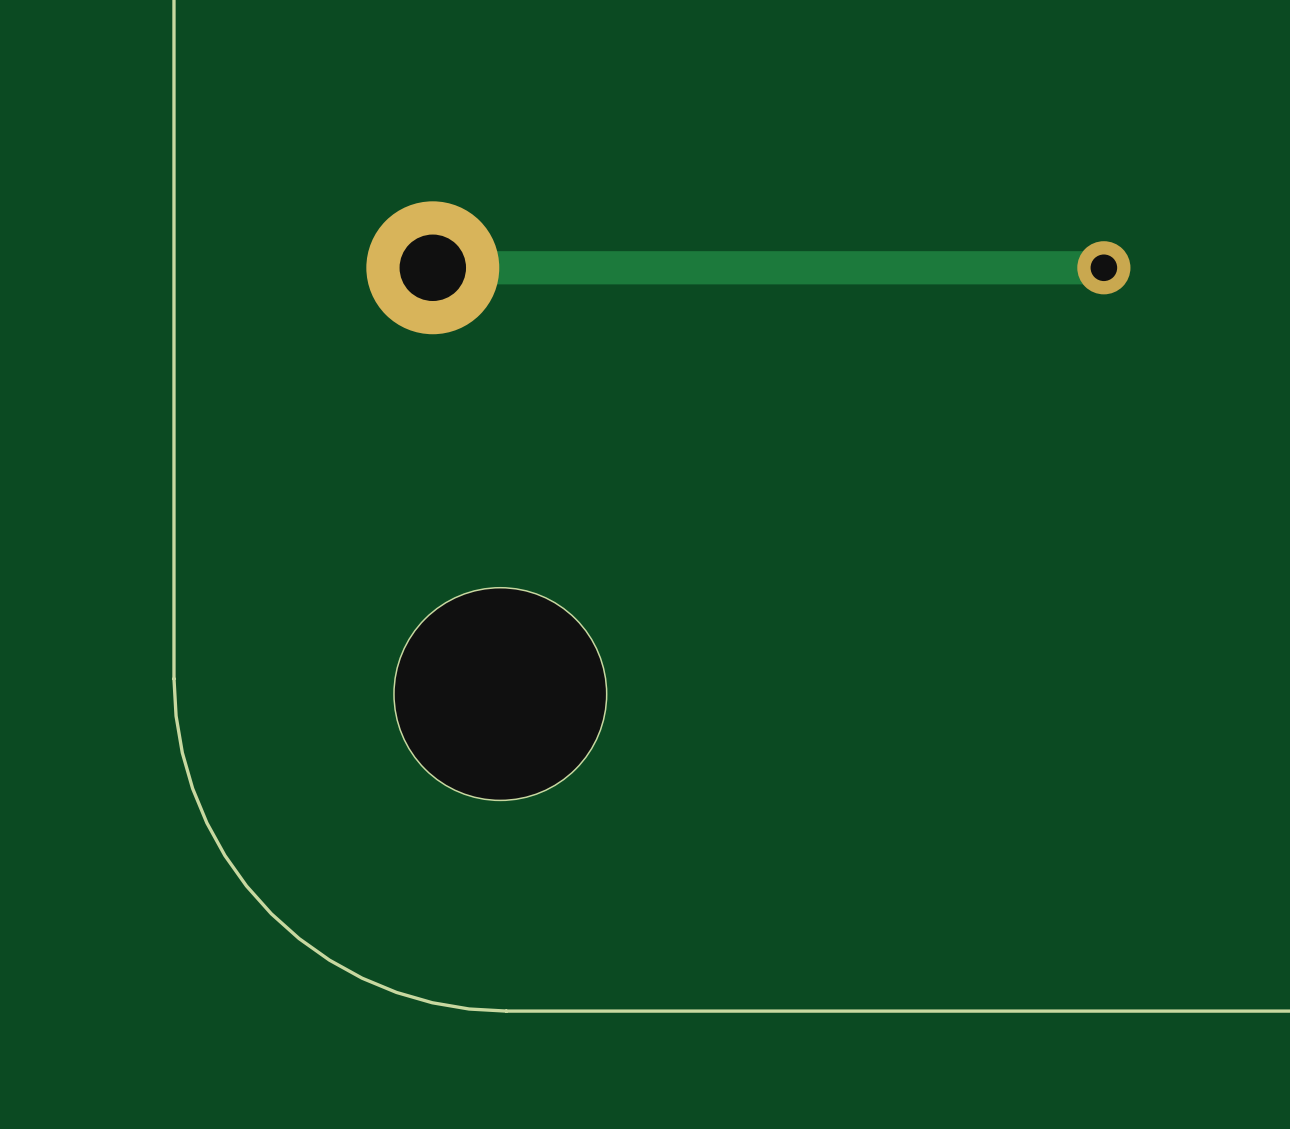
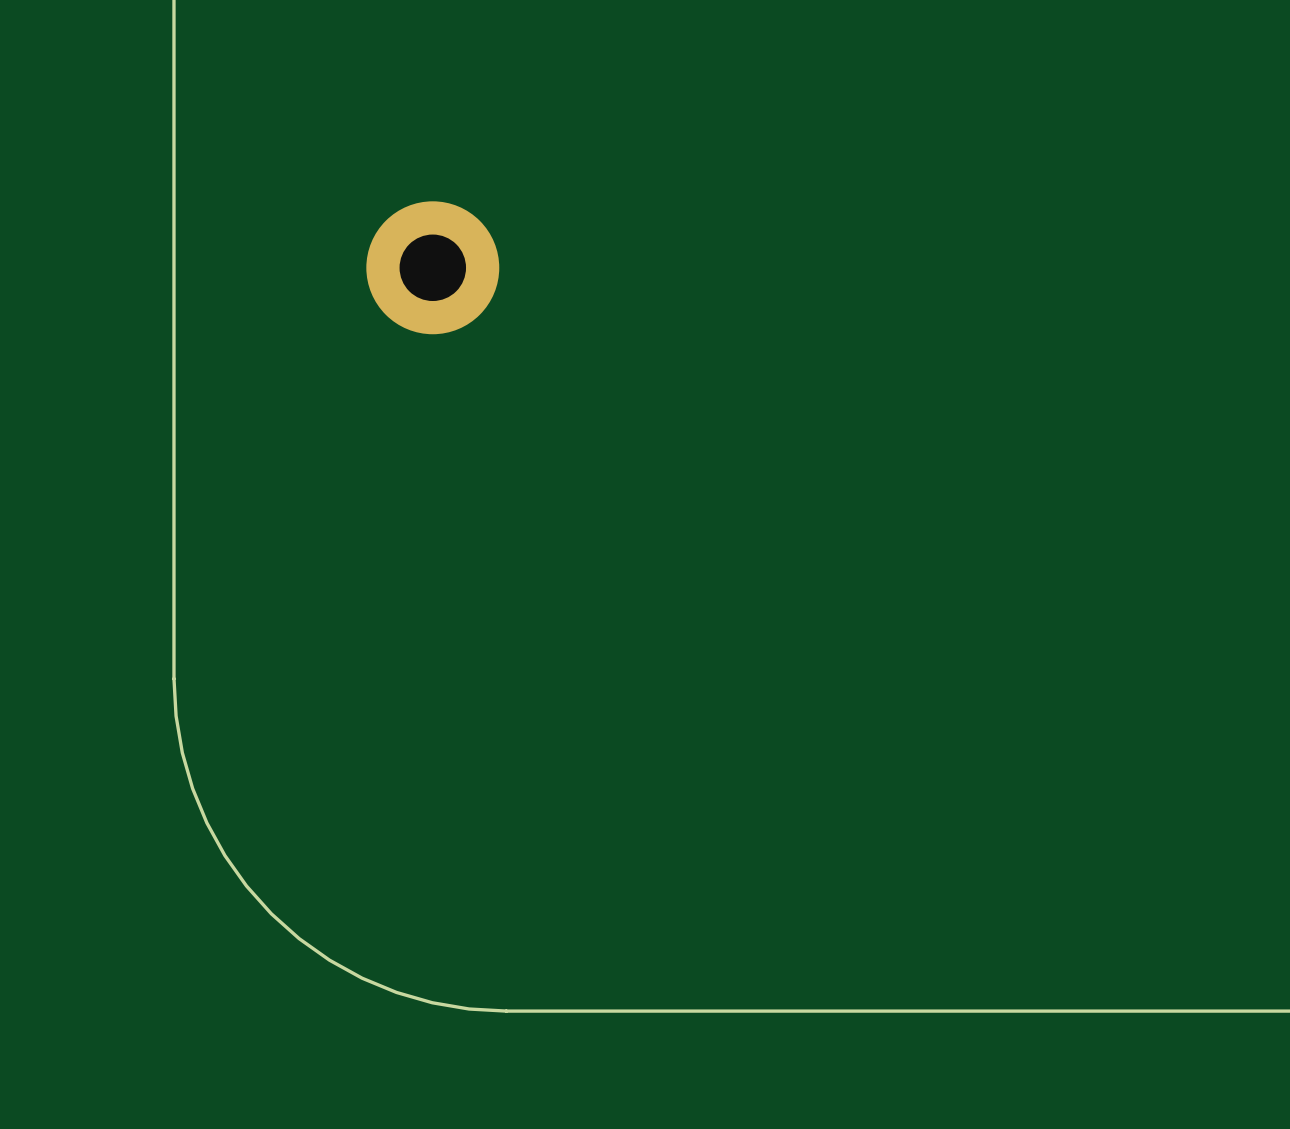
track: (1103, 267) (432, 267) -> none
via: (1103, 267) -> none
part: (500, 694) -> none

